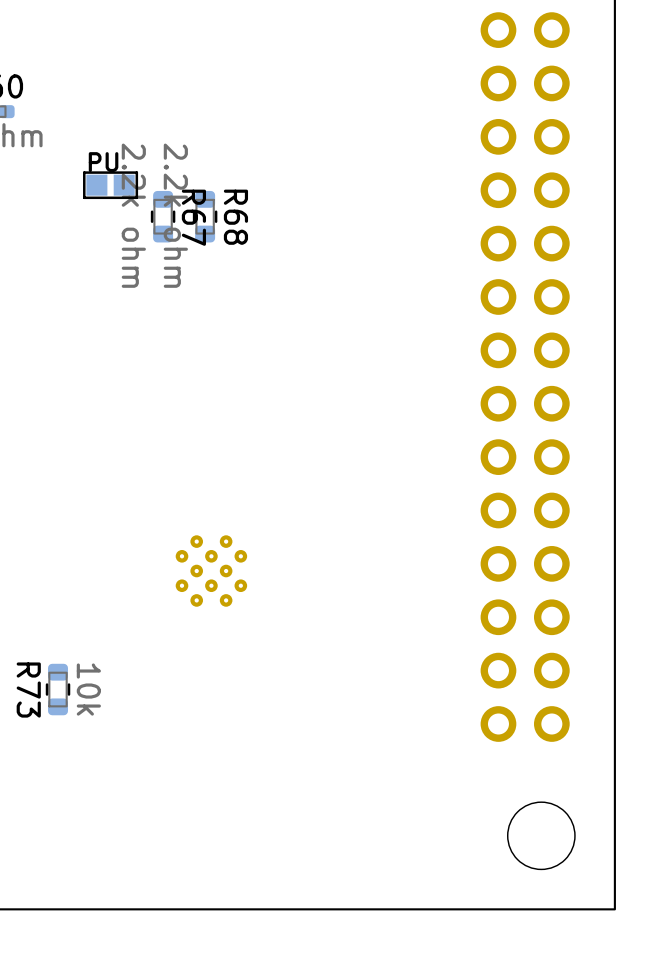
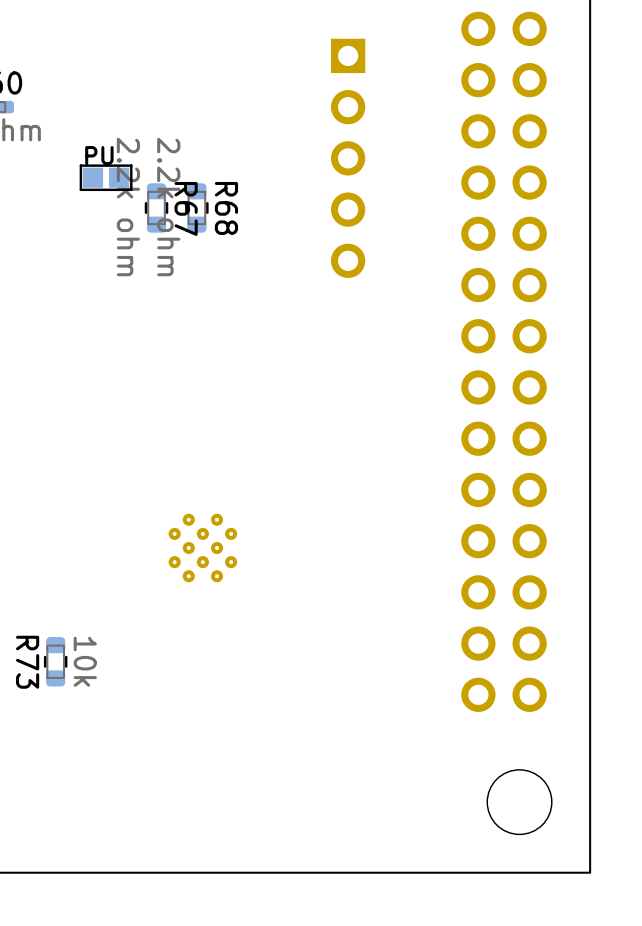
part: none -> (348, 158)

